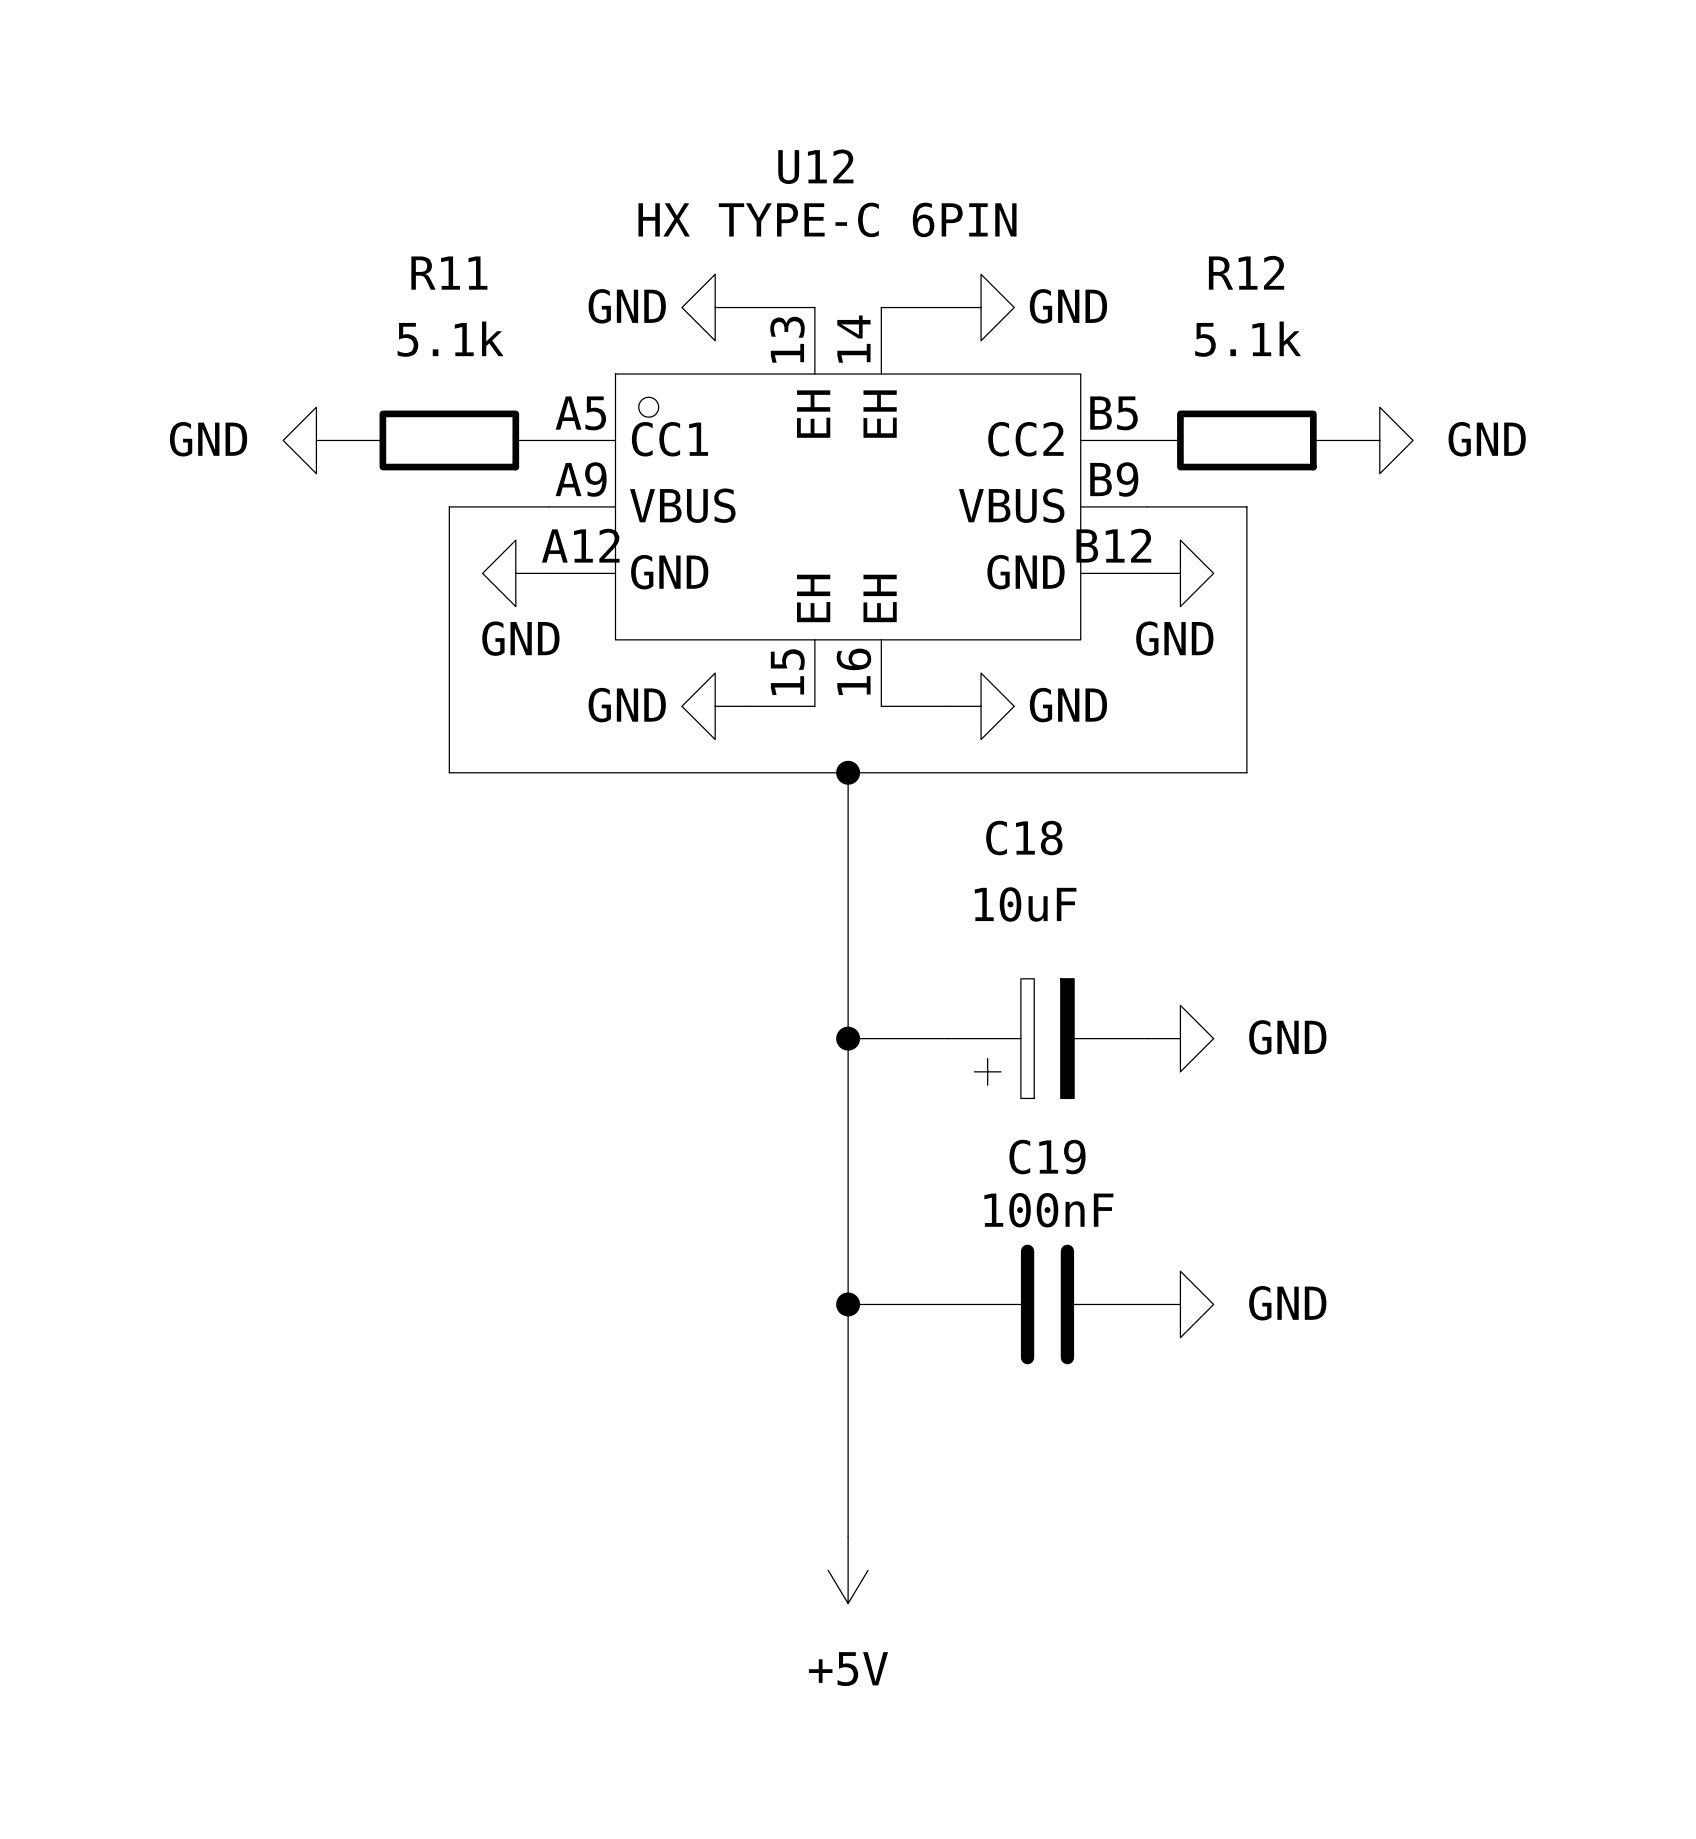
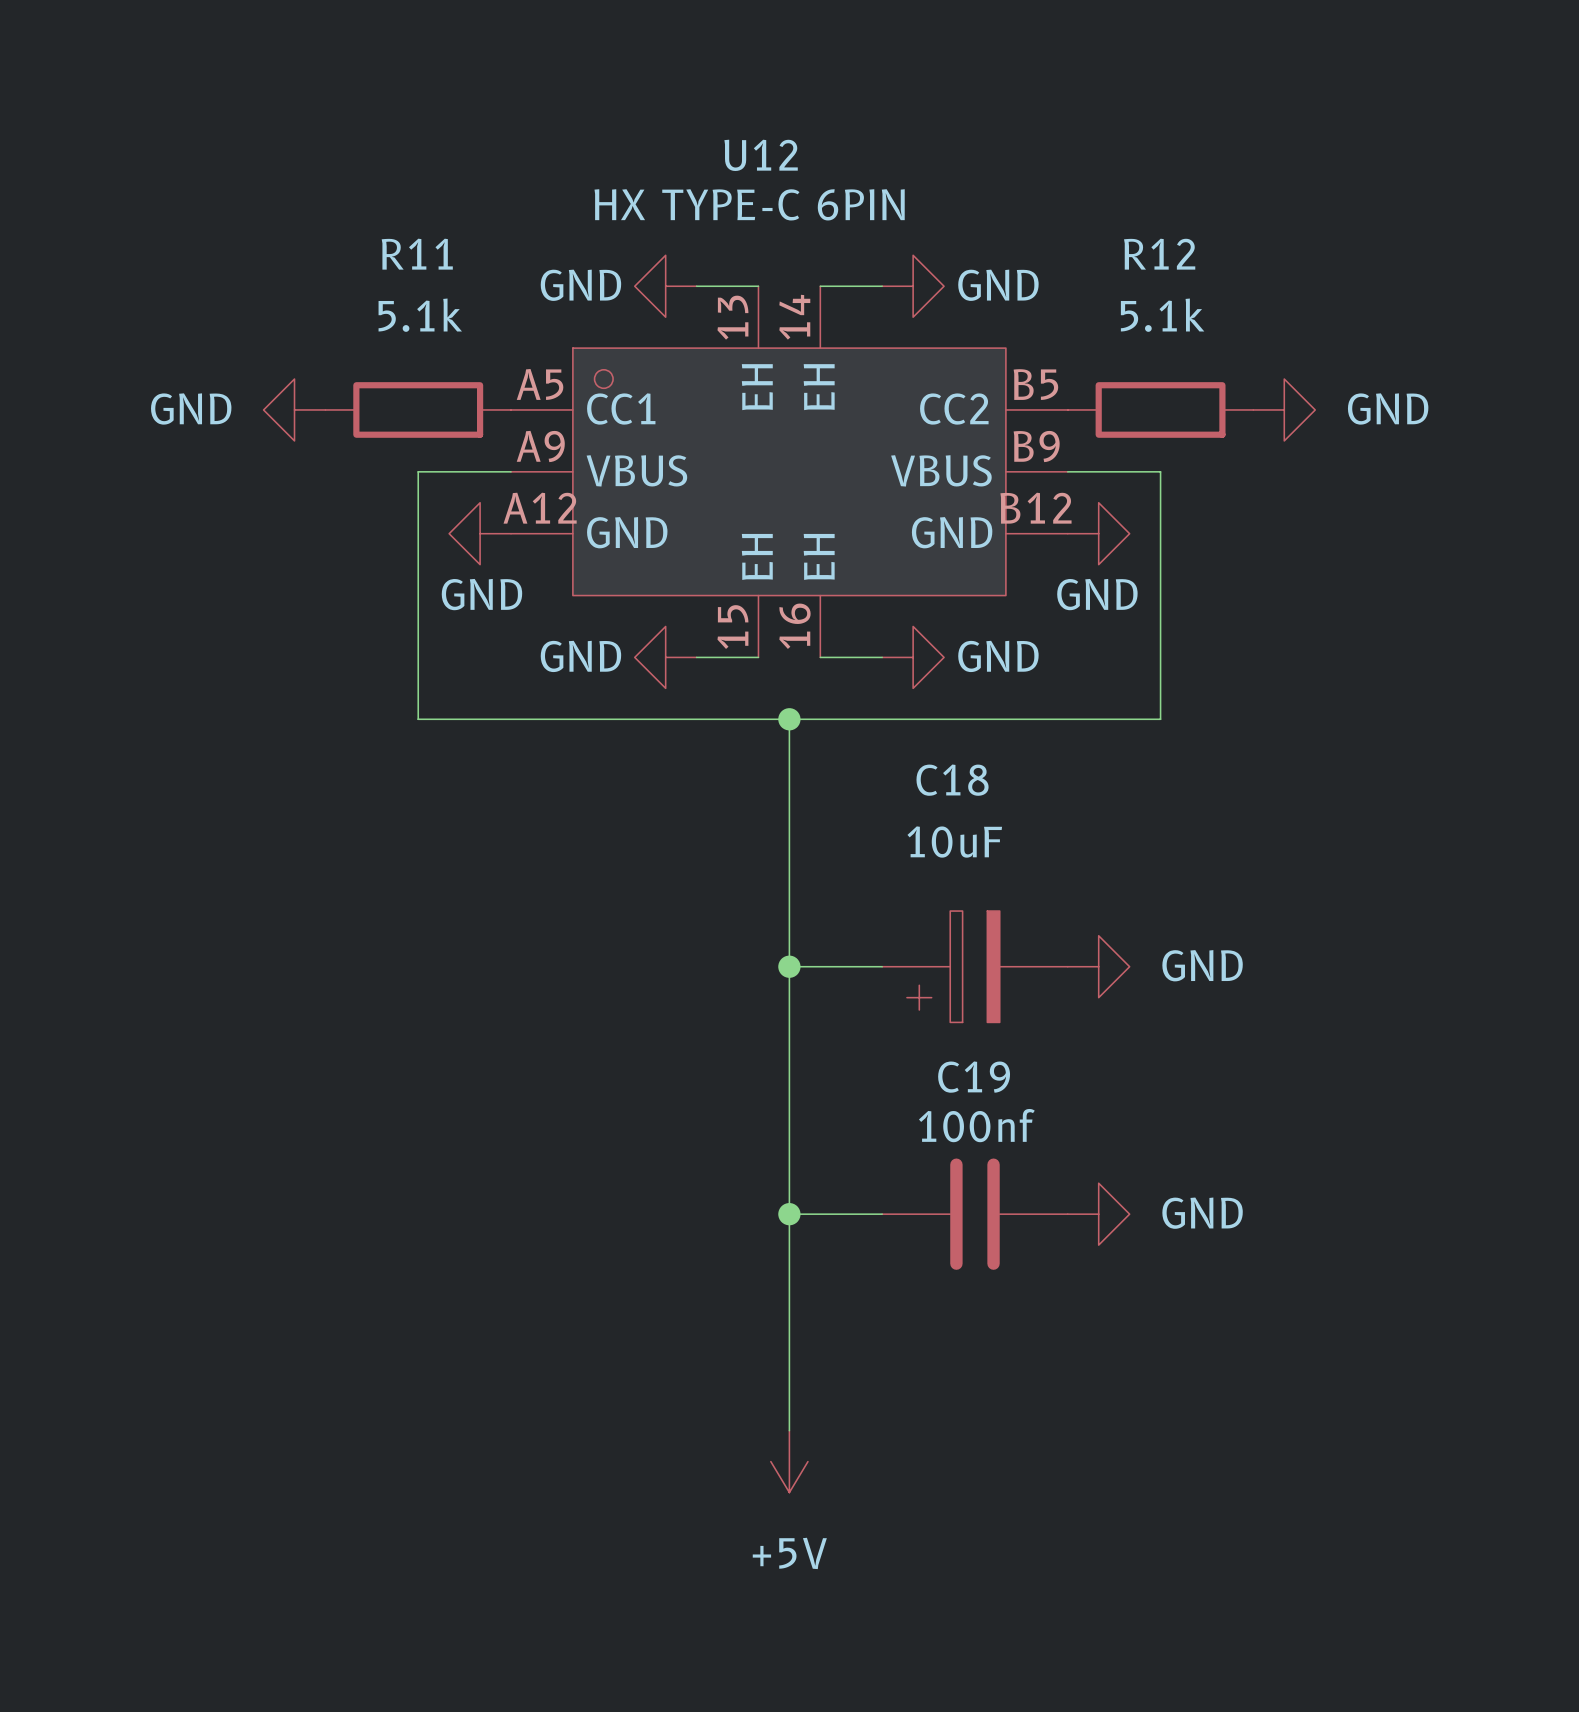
C19 value: 100nF (1048, 1210) -> 100nf (976, 1125)

